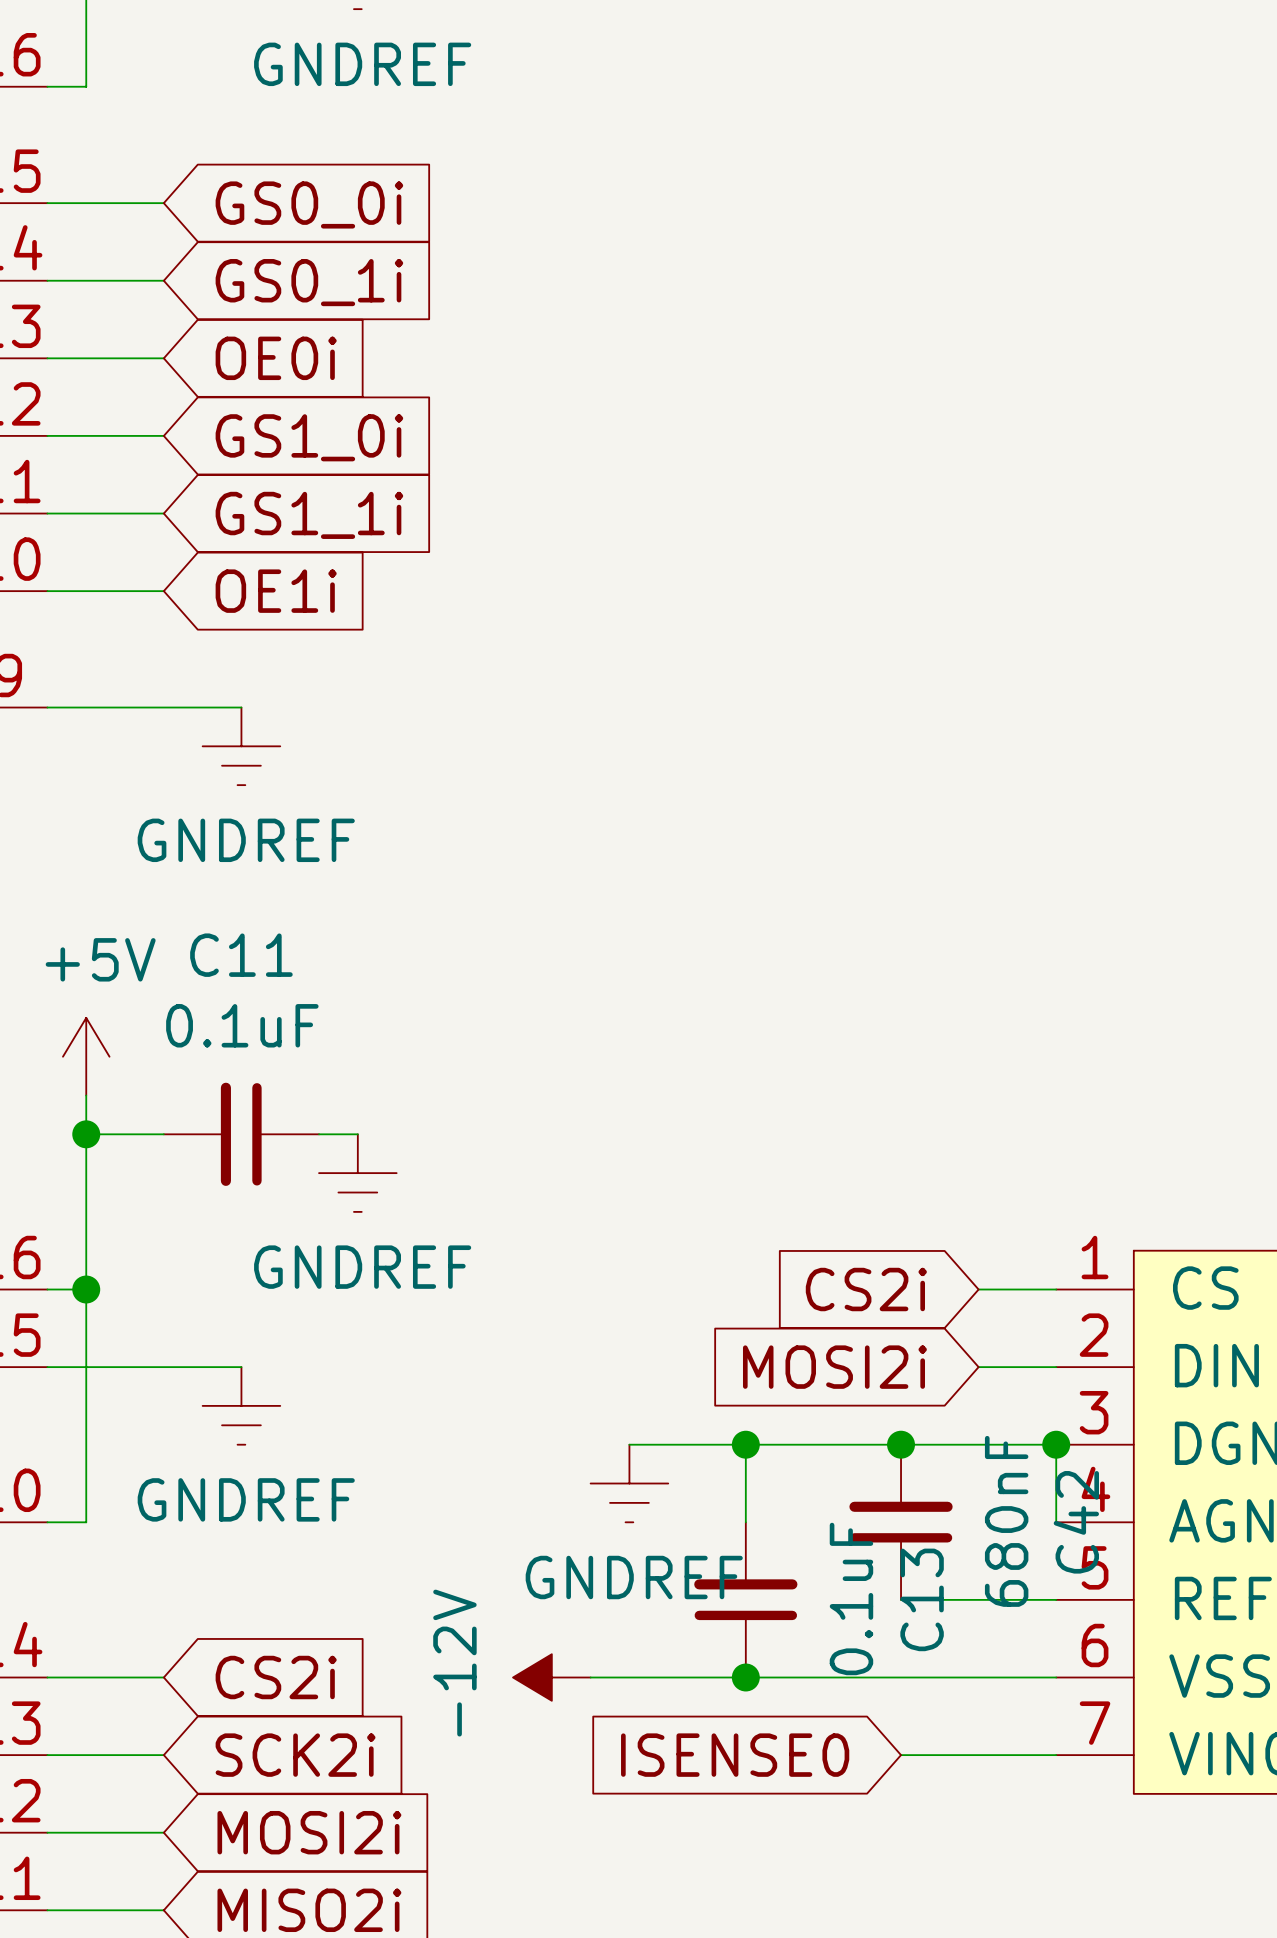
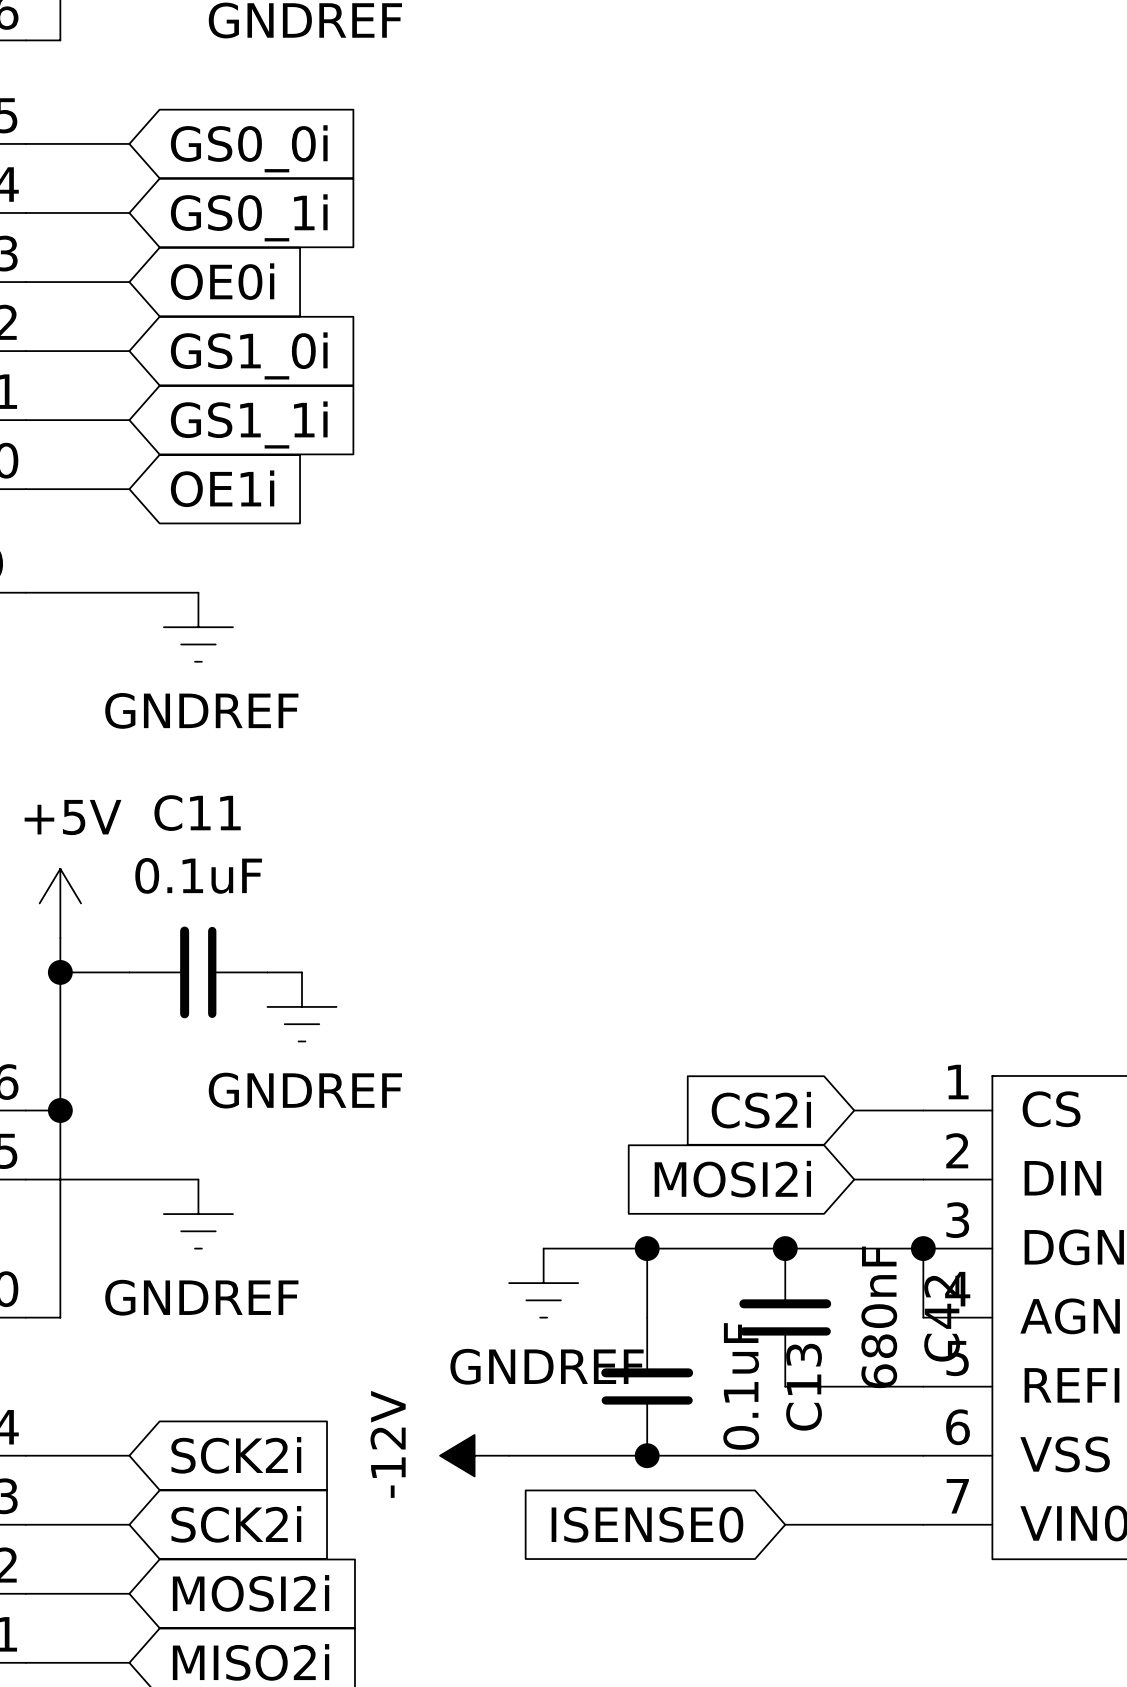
global label: CS2i (276, 1677) -> SCK2i (236, 1455)

